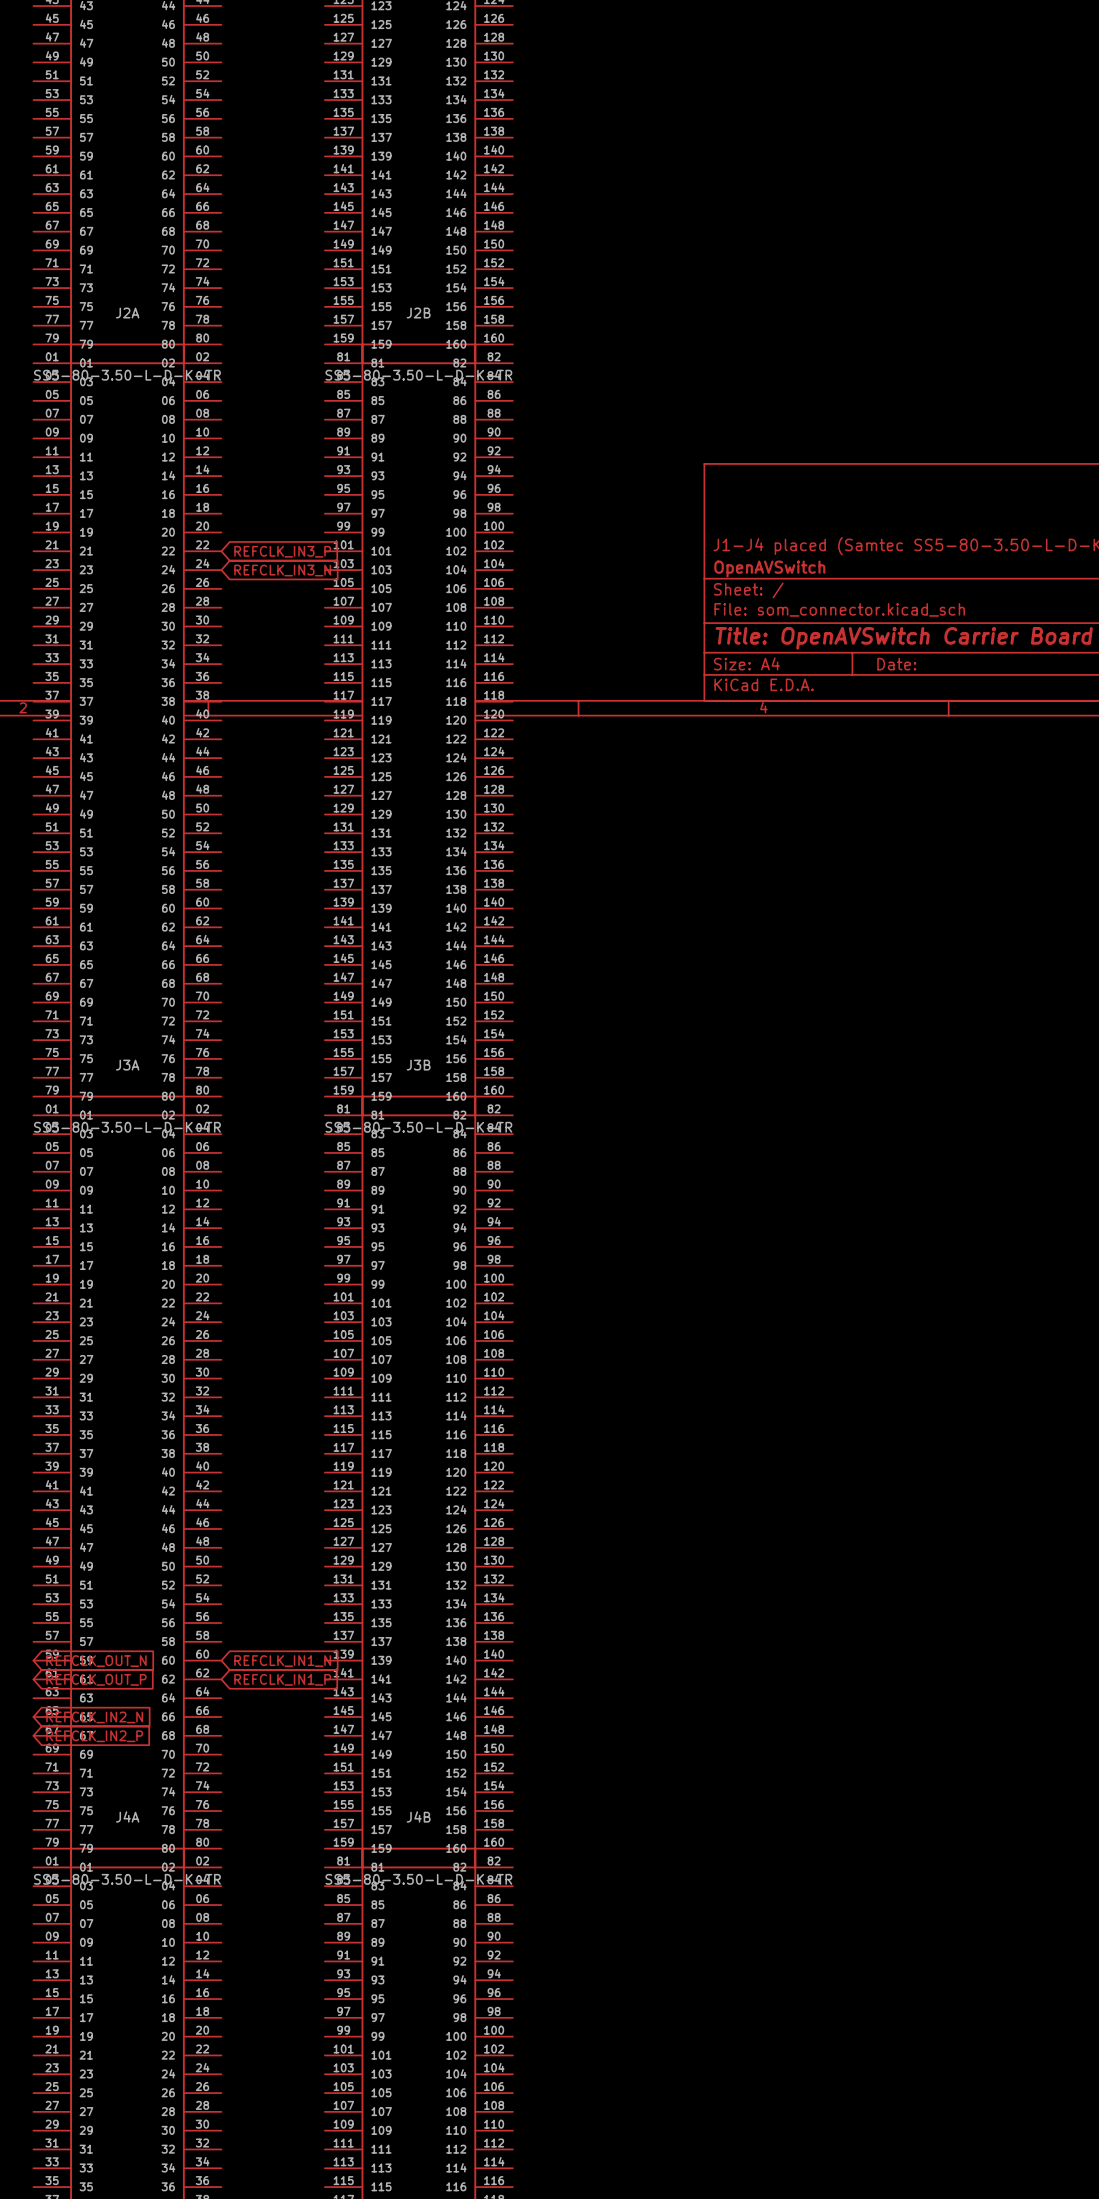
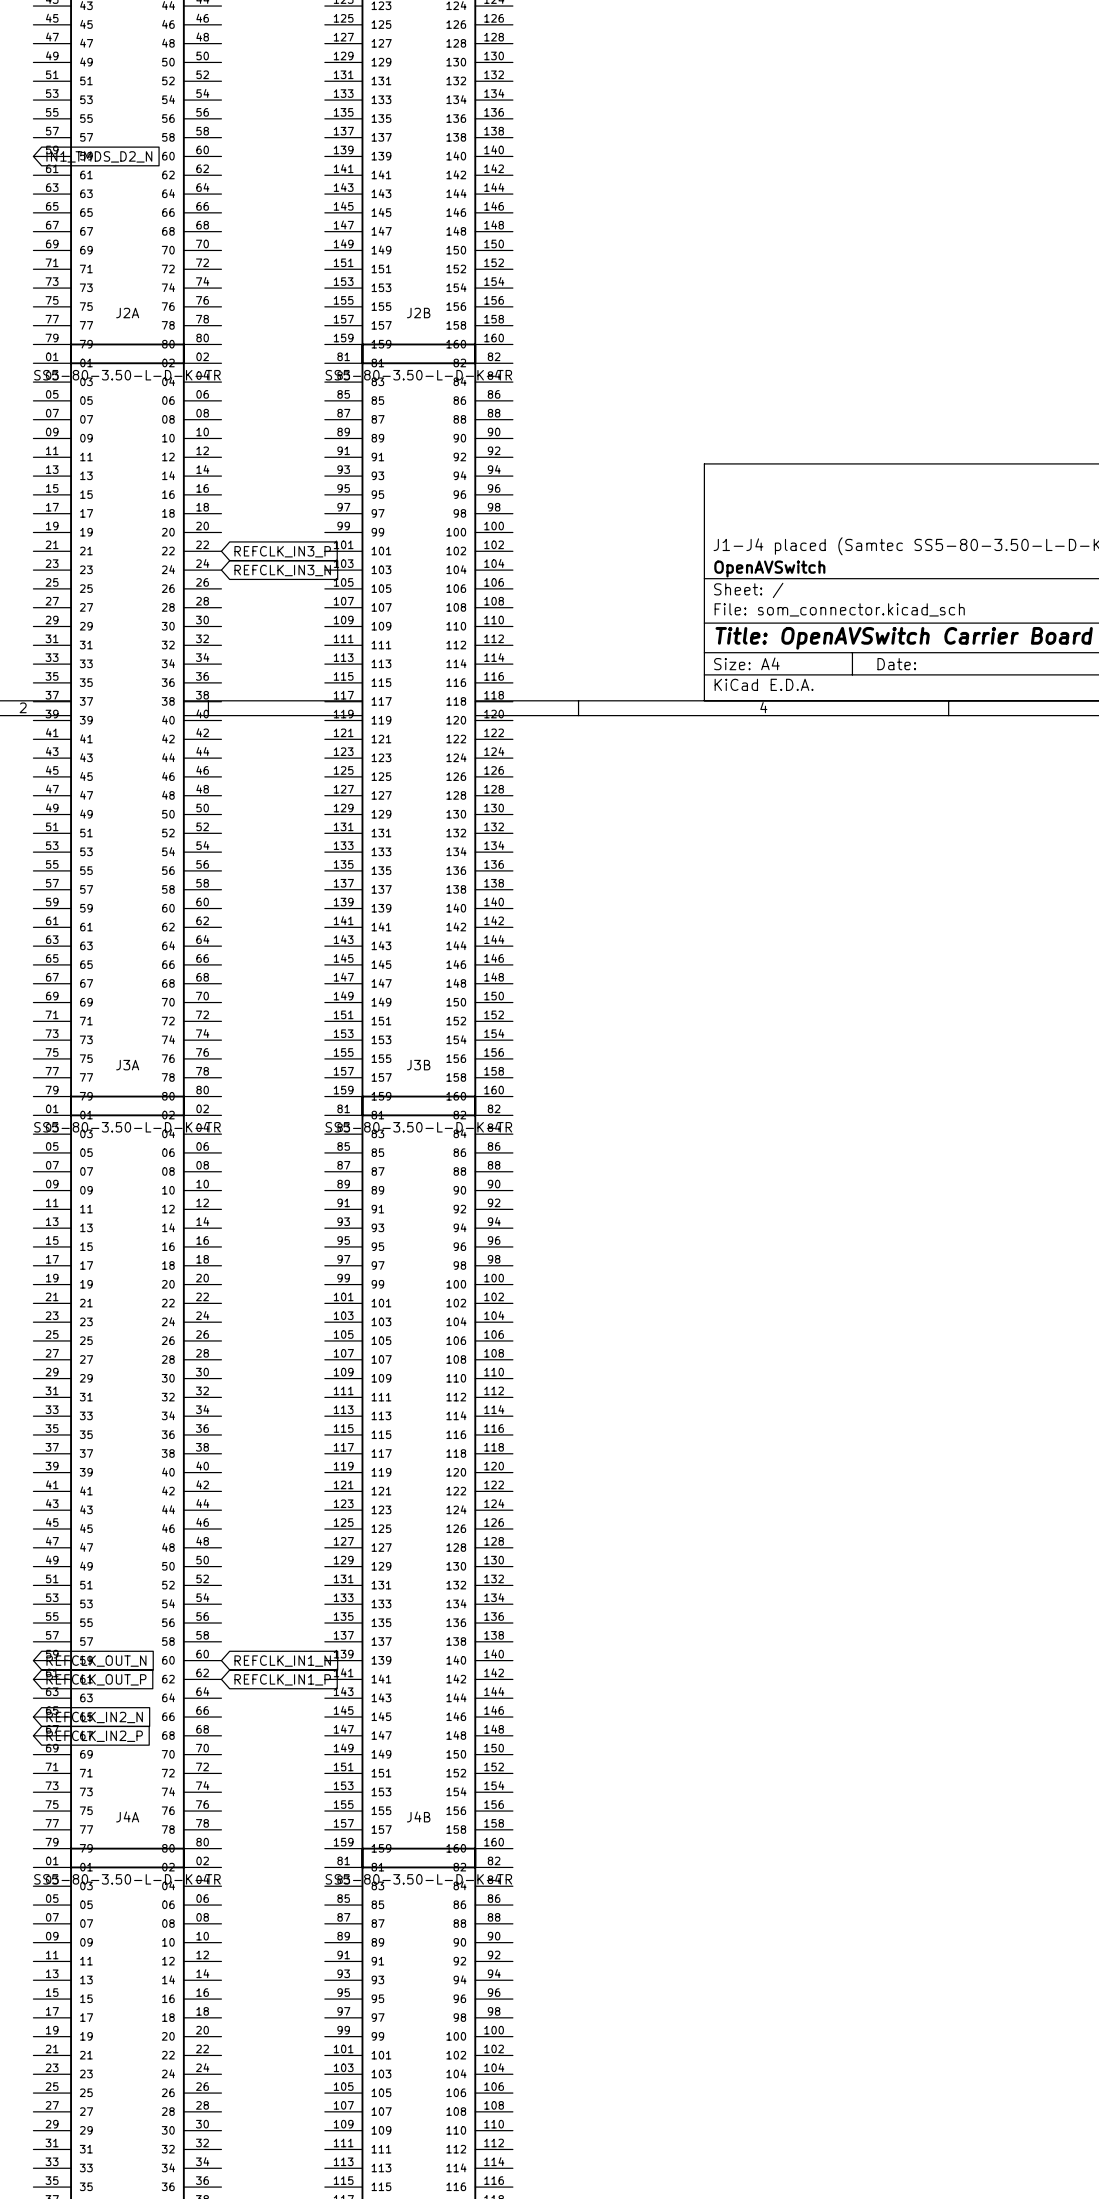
global label: none -> IN1_TMDS_D2_N (99, 156)

